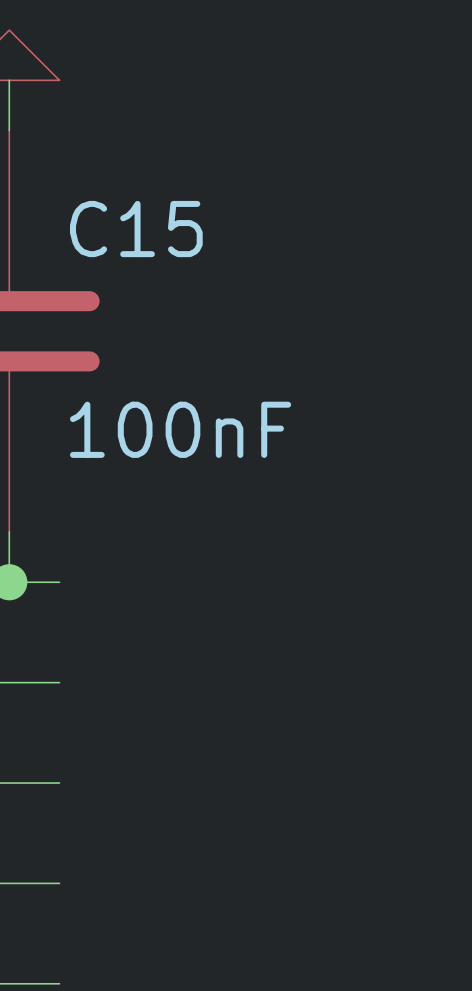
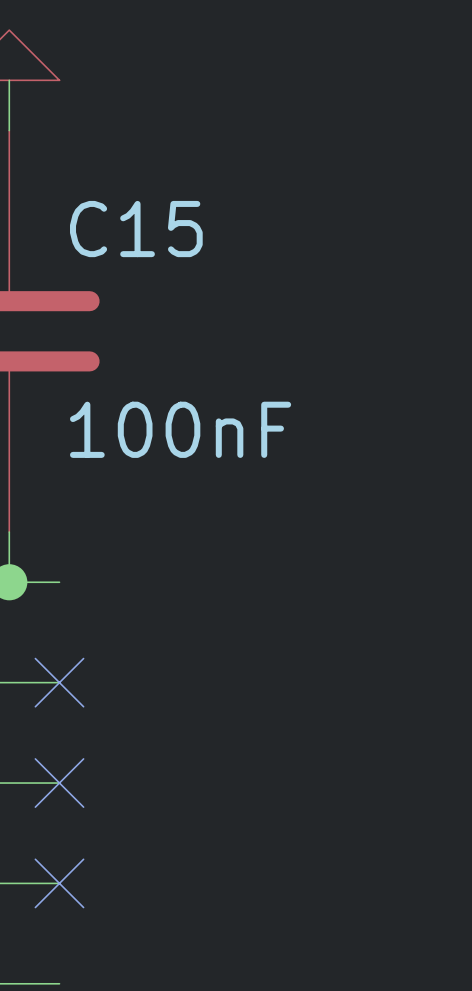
no-connect mark: none -> (59, 682)
no-connect mark: none -> (59, 783)
no-connect mark: none -> (59, 883)

